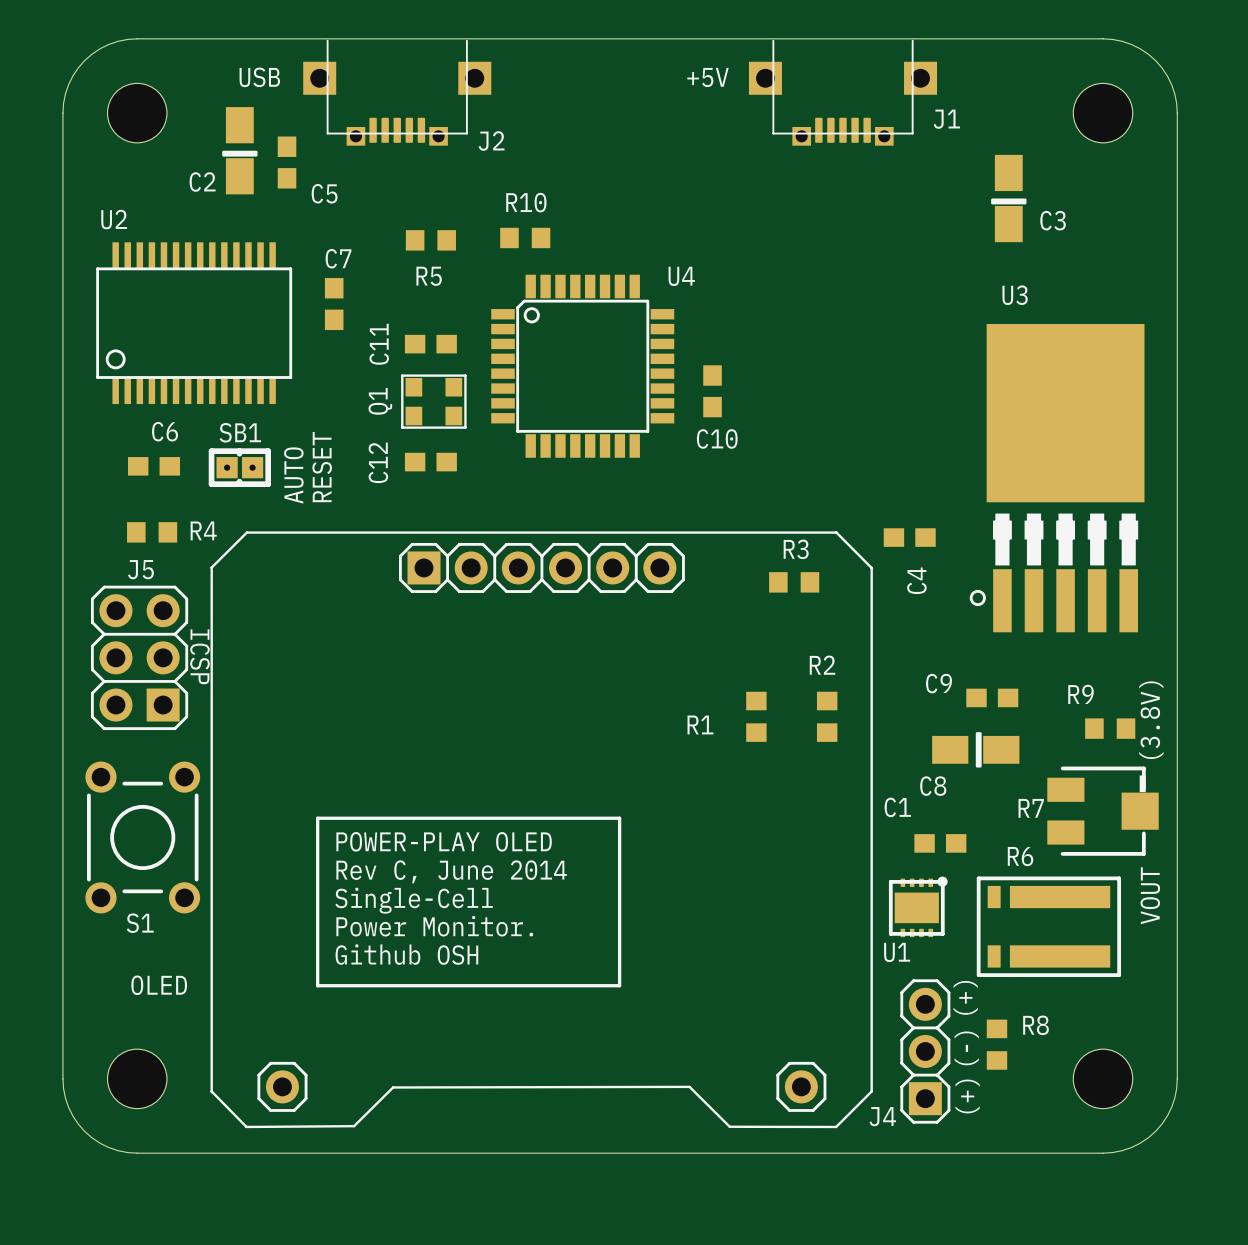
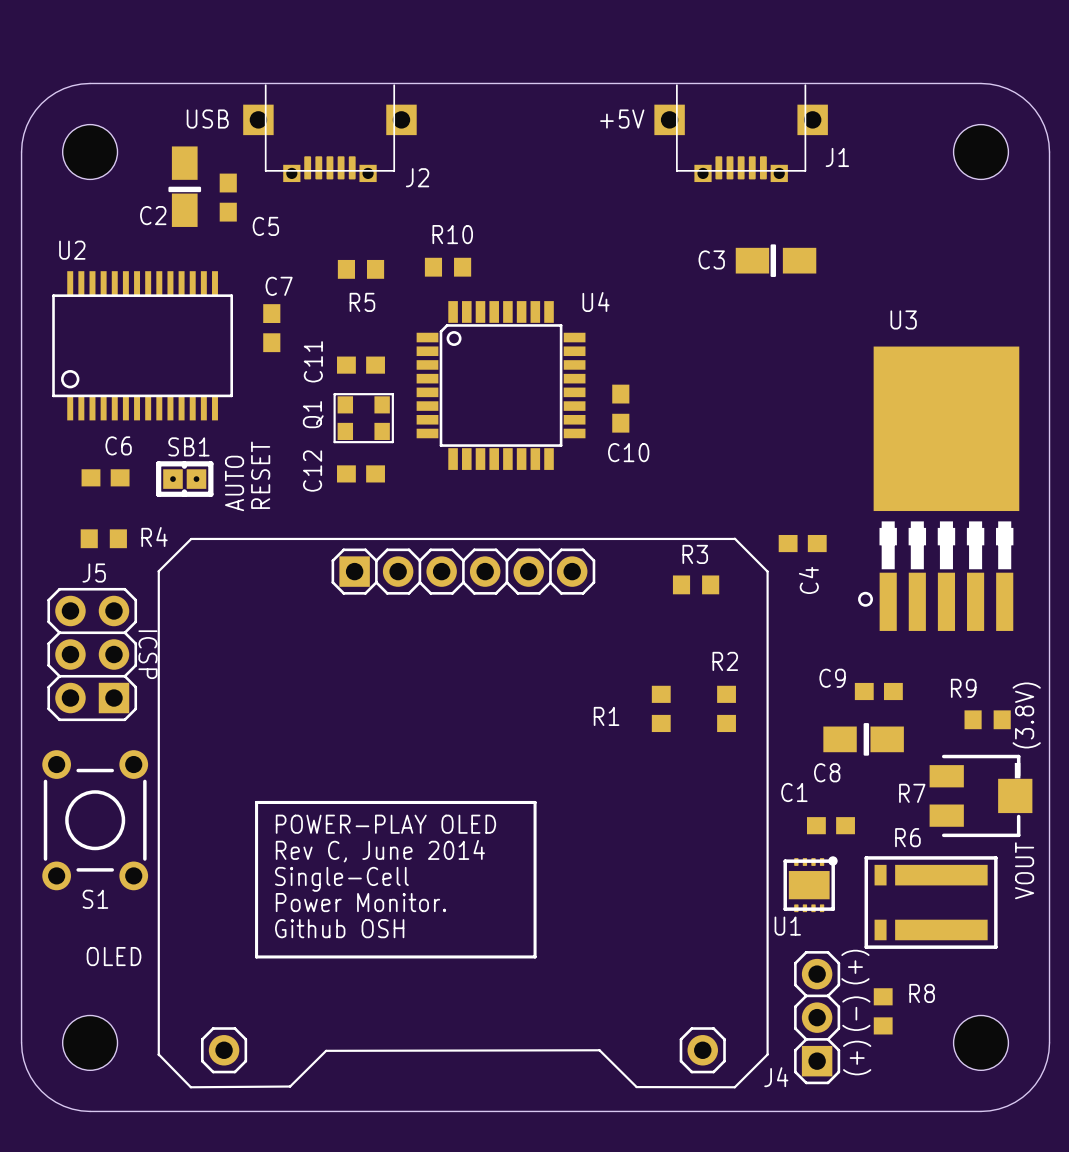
C3 rotation: 0° (1008, 198) -> 90° clockwise (776, 260)
C3 position: (1008, 198) -> (776, 260)
C3 name position: C3 (1053, 220) -> C3 (711, 259)

